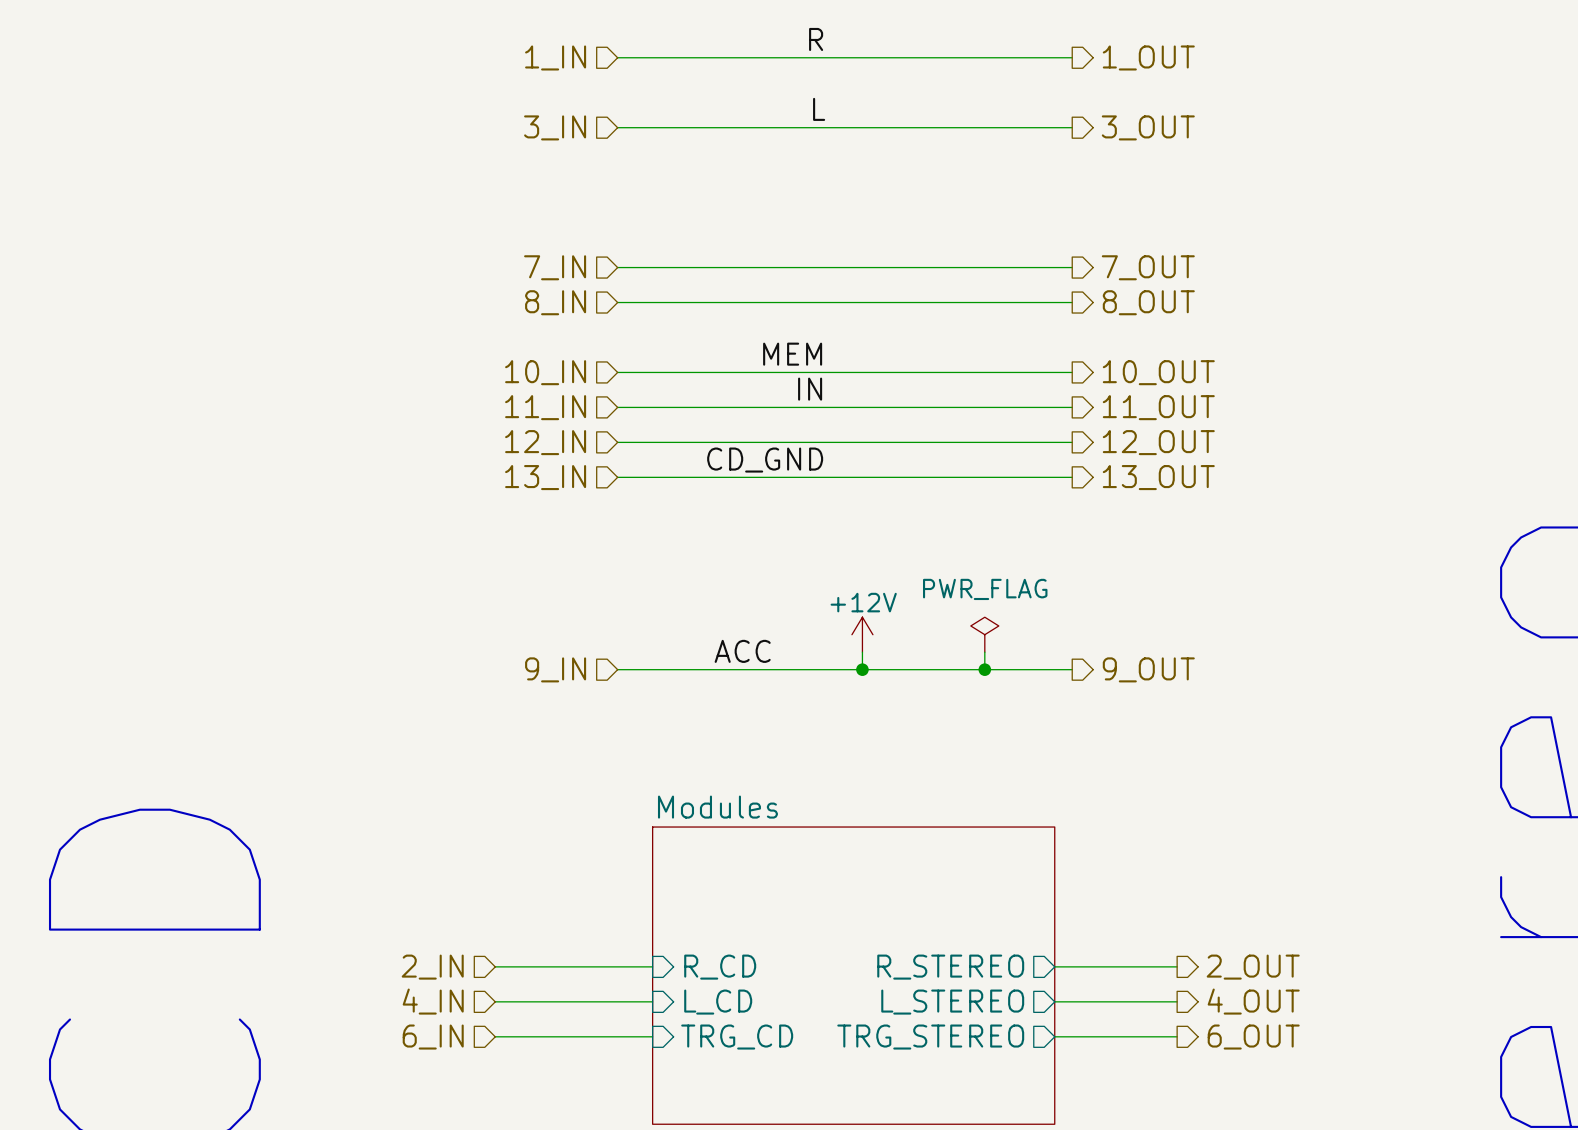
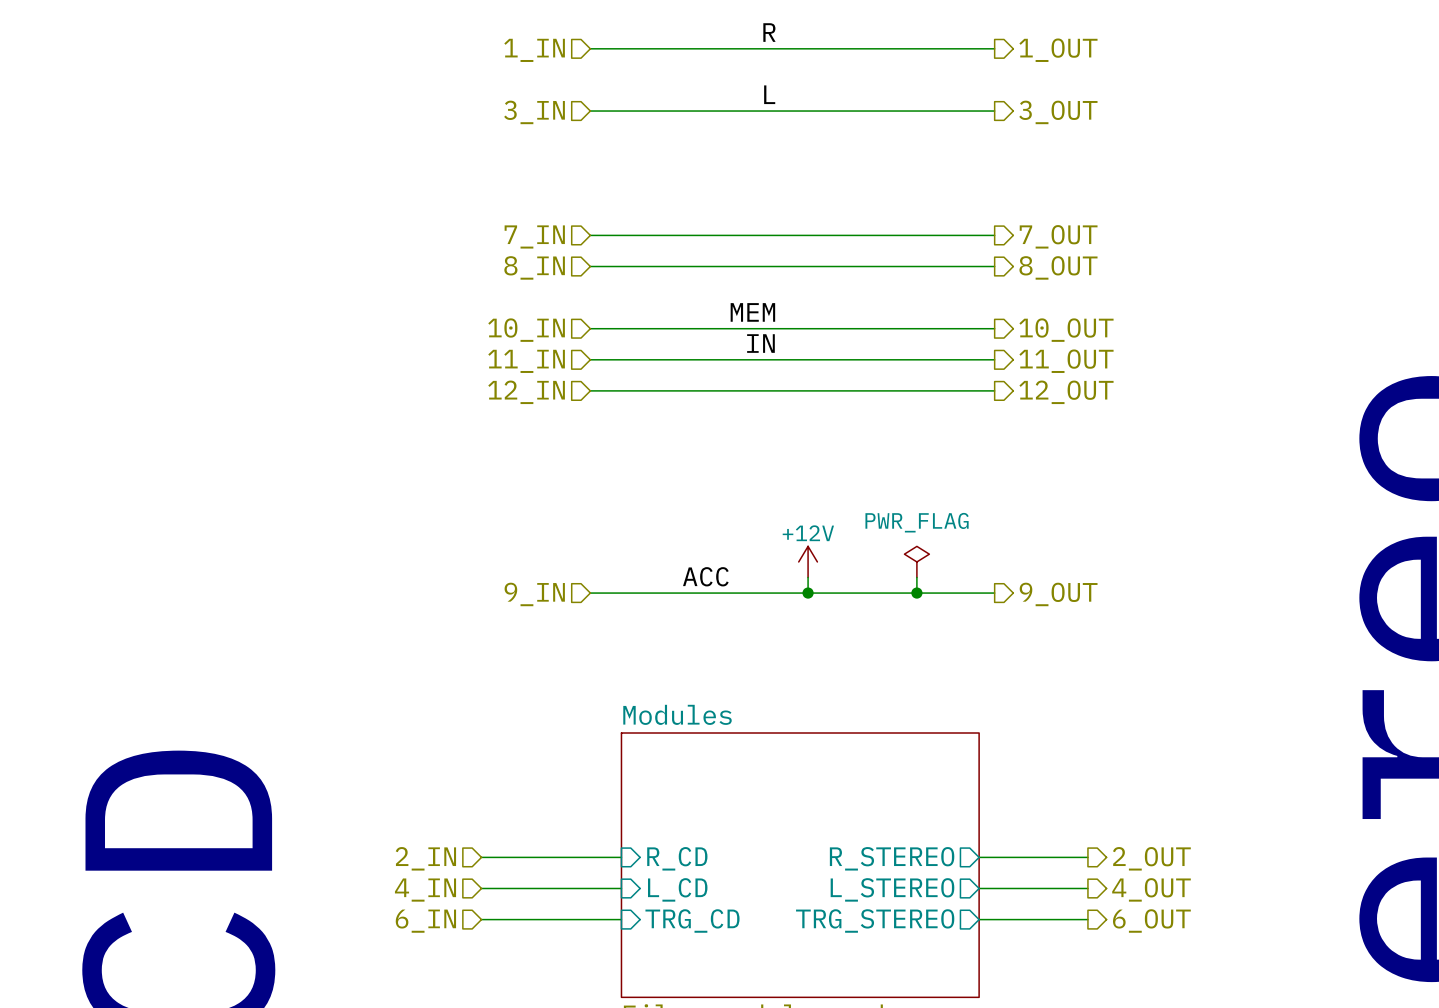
label: CD_GND (765, 460) -> none
hierarchical label: 13_IN (545, 477) -> none
wire: (617, 477) (1072, 477) -> none
hierarchical label: 13_OUT (1158, 477) -> none

